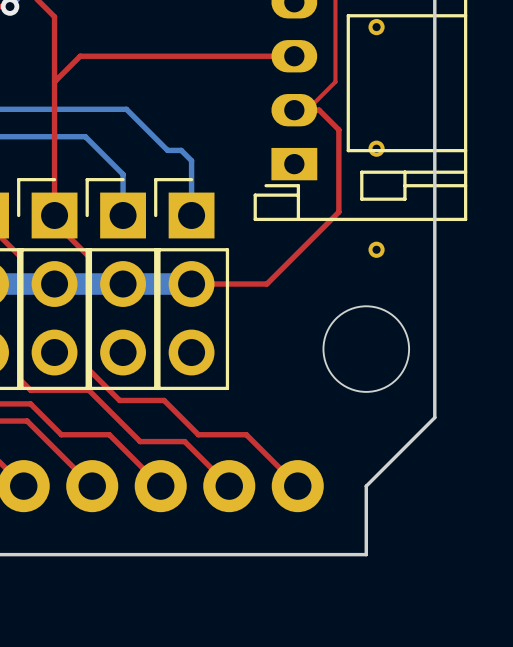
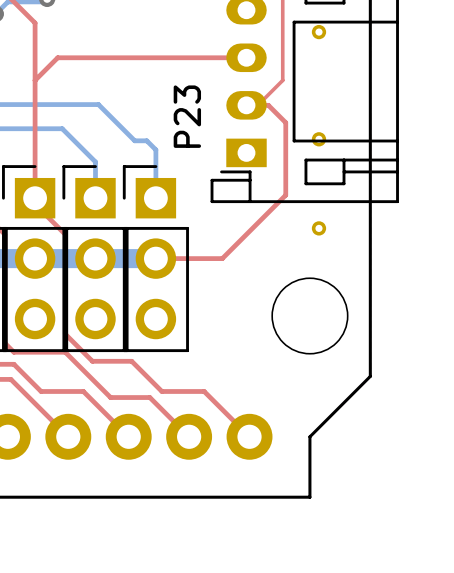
P23 name: none -> P23 (187, 116)

